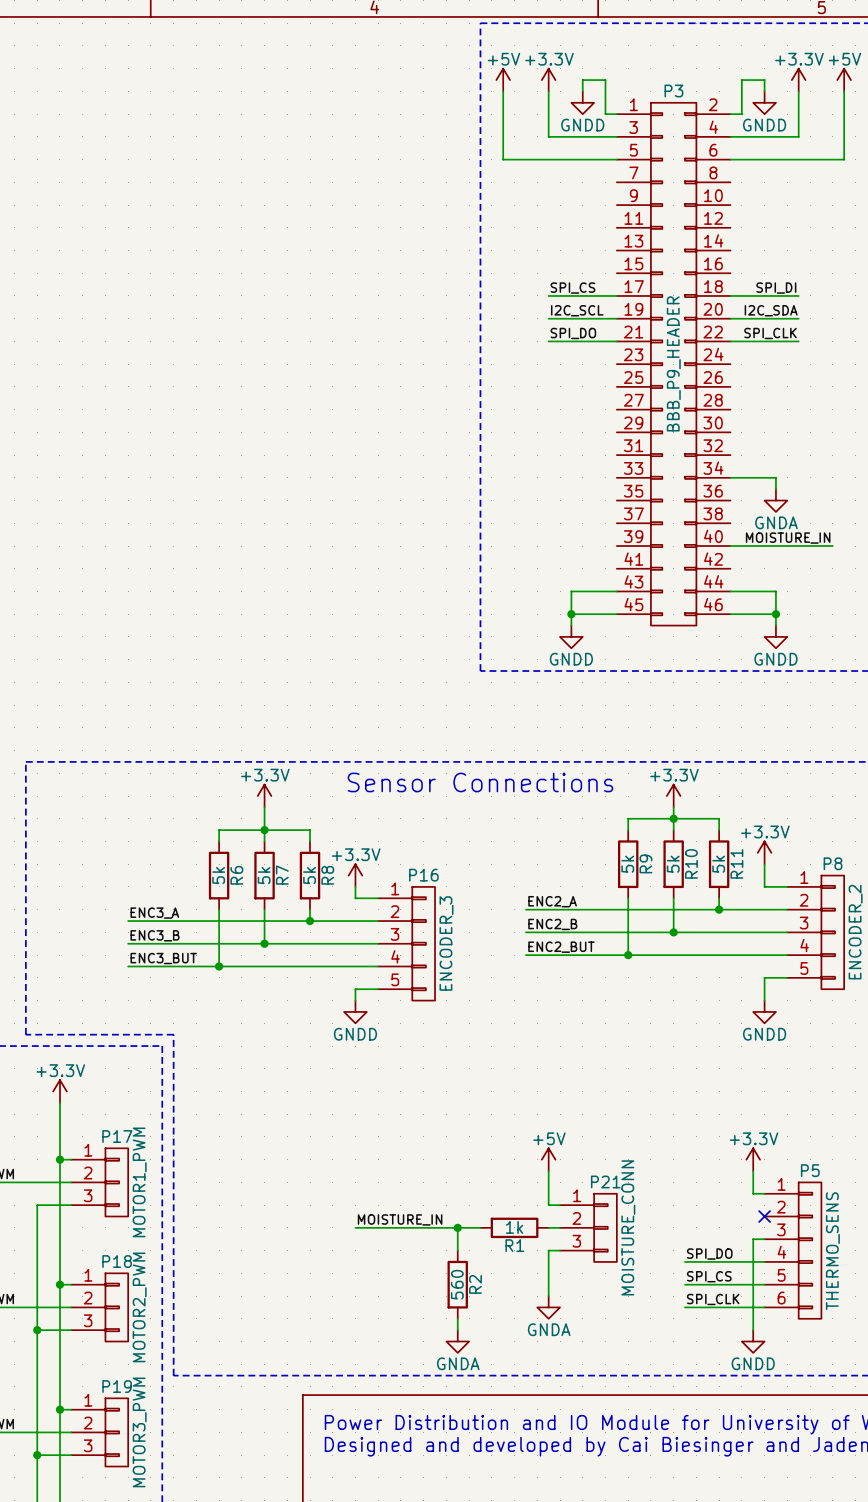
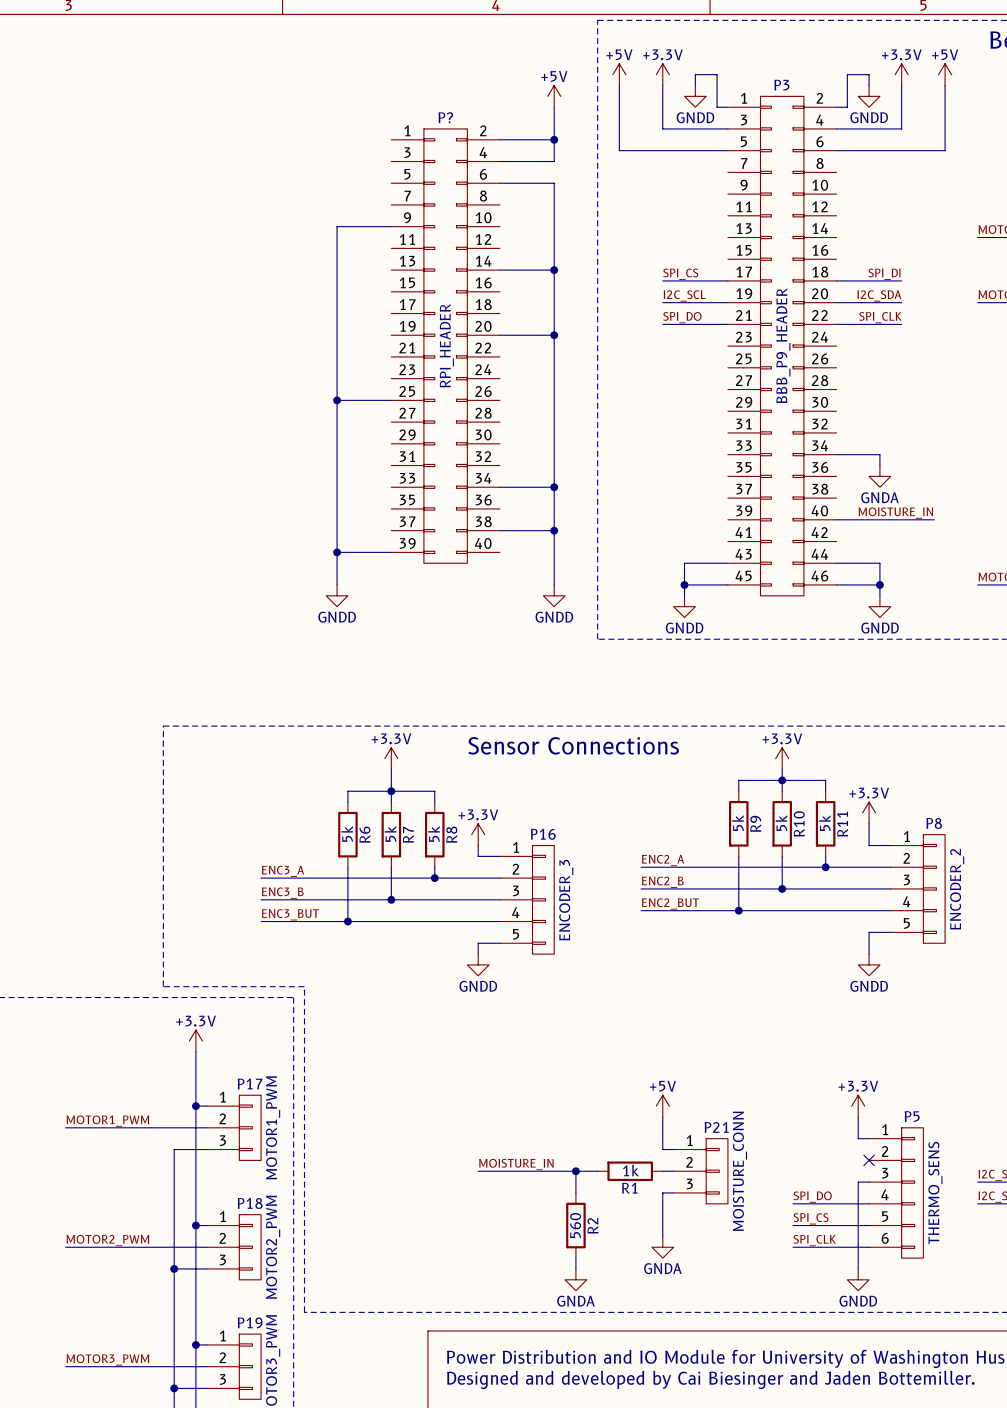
power symbol: none -> +5V (554, 96)
wire: none -> (554, 107) (554, 161) (499, 161)
wire: none -> (499, 139) (554, 139)
junction: none -> (554, 139)
wire: none -> (499, 183) (554, 183) (554, 584)
wire: none -> (391, 226) (337, 226) (337, 584)
wire: none -> (499, 270) (554, 270)
junction: none -> (554, 270)
wire: none -> (499, 335) (554, 335)
junction: none -> (554, 335)
P?: none -> RPI_HEADER (445, 346)
wire: none -> (337, 400) (391, 400)
junction: none -> (337, 400)
wire: none -> (499, 487) (554, 487)
junction: none -> (554, 487)
wire: none -> (499, 530) (554, 530)
junction: none -> (554, 530)
wire: none -> (337, 552) (391, 552)
junction: none -> (337, 552)
power symbol: none -> GNDD (337, 595)
power symbol: none -> GNDD (554, 595)

